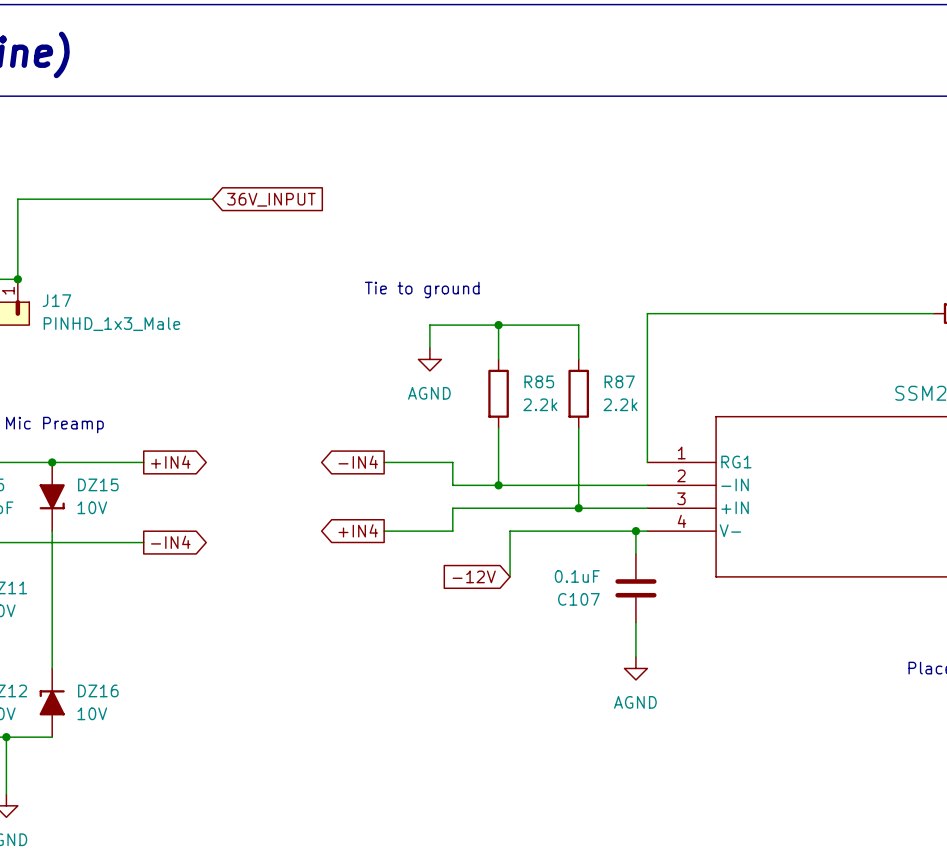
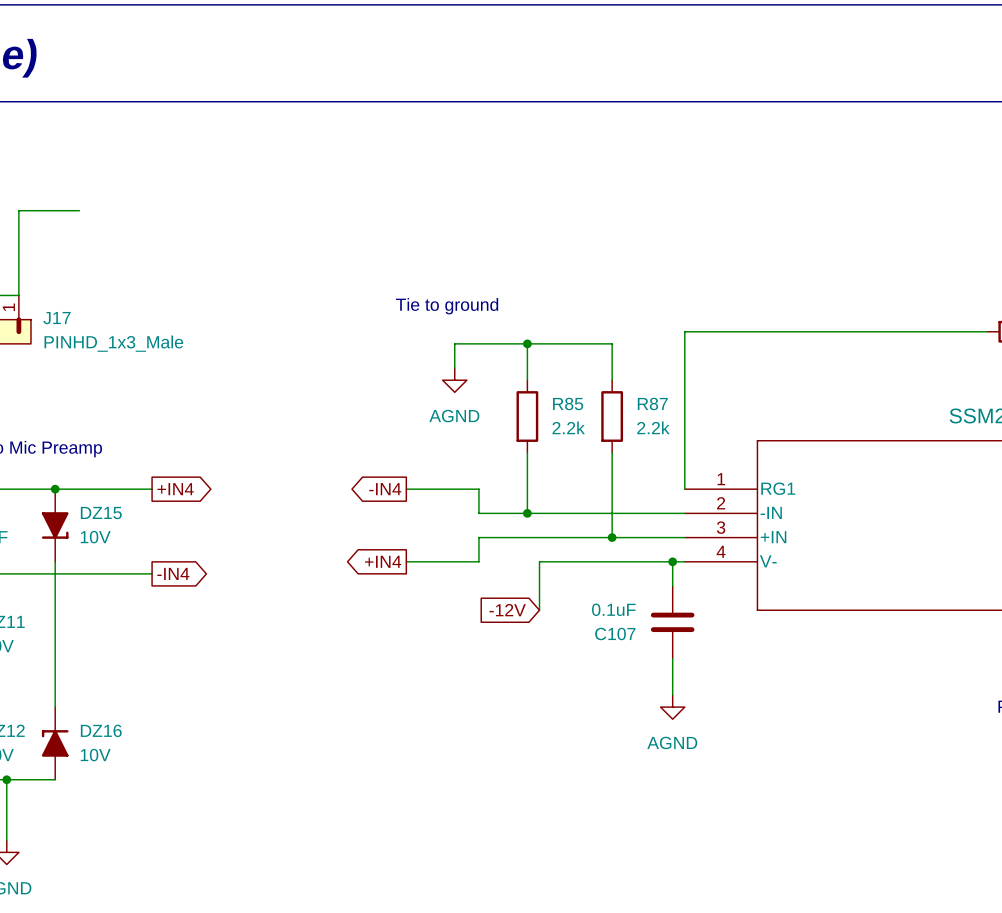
wire: (75, 199) (212, 199) -> none
global label: 36V_INPUT (271, 199) -> none
junction: (17, 279) -> none

